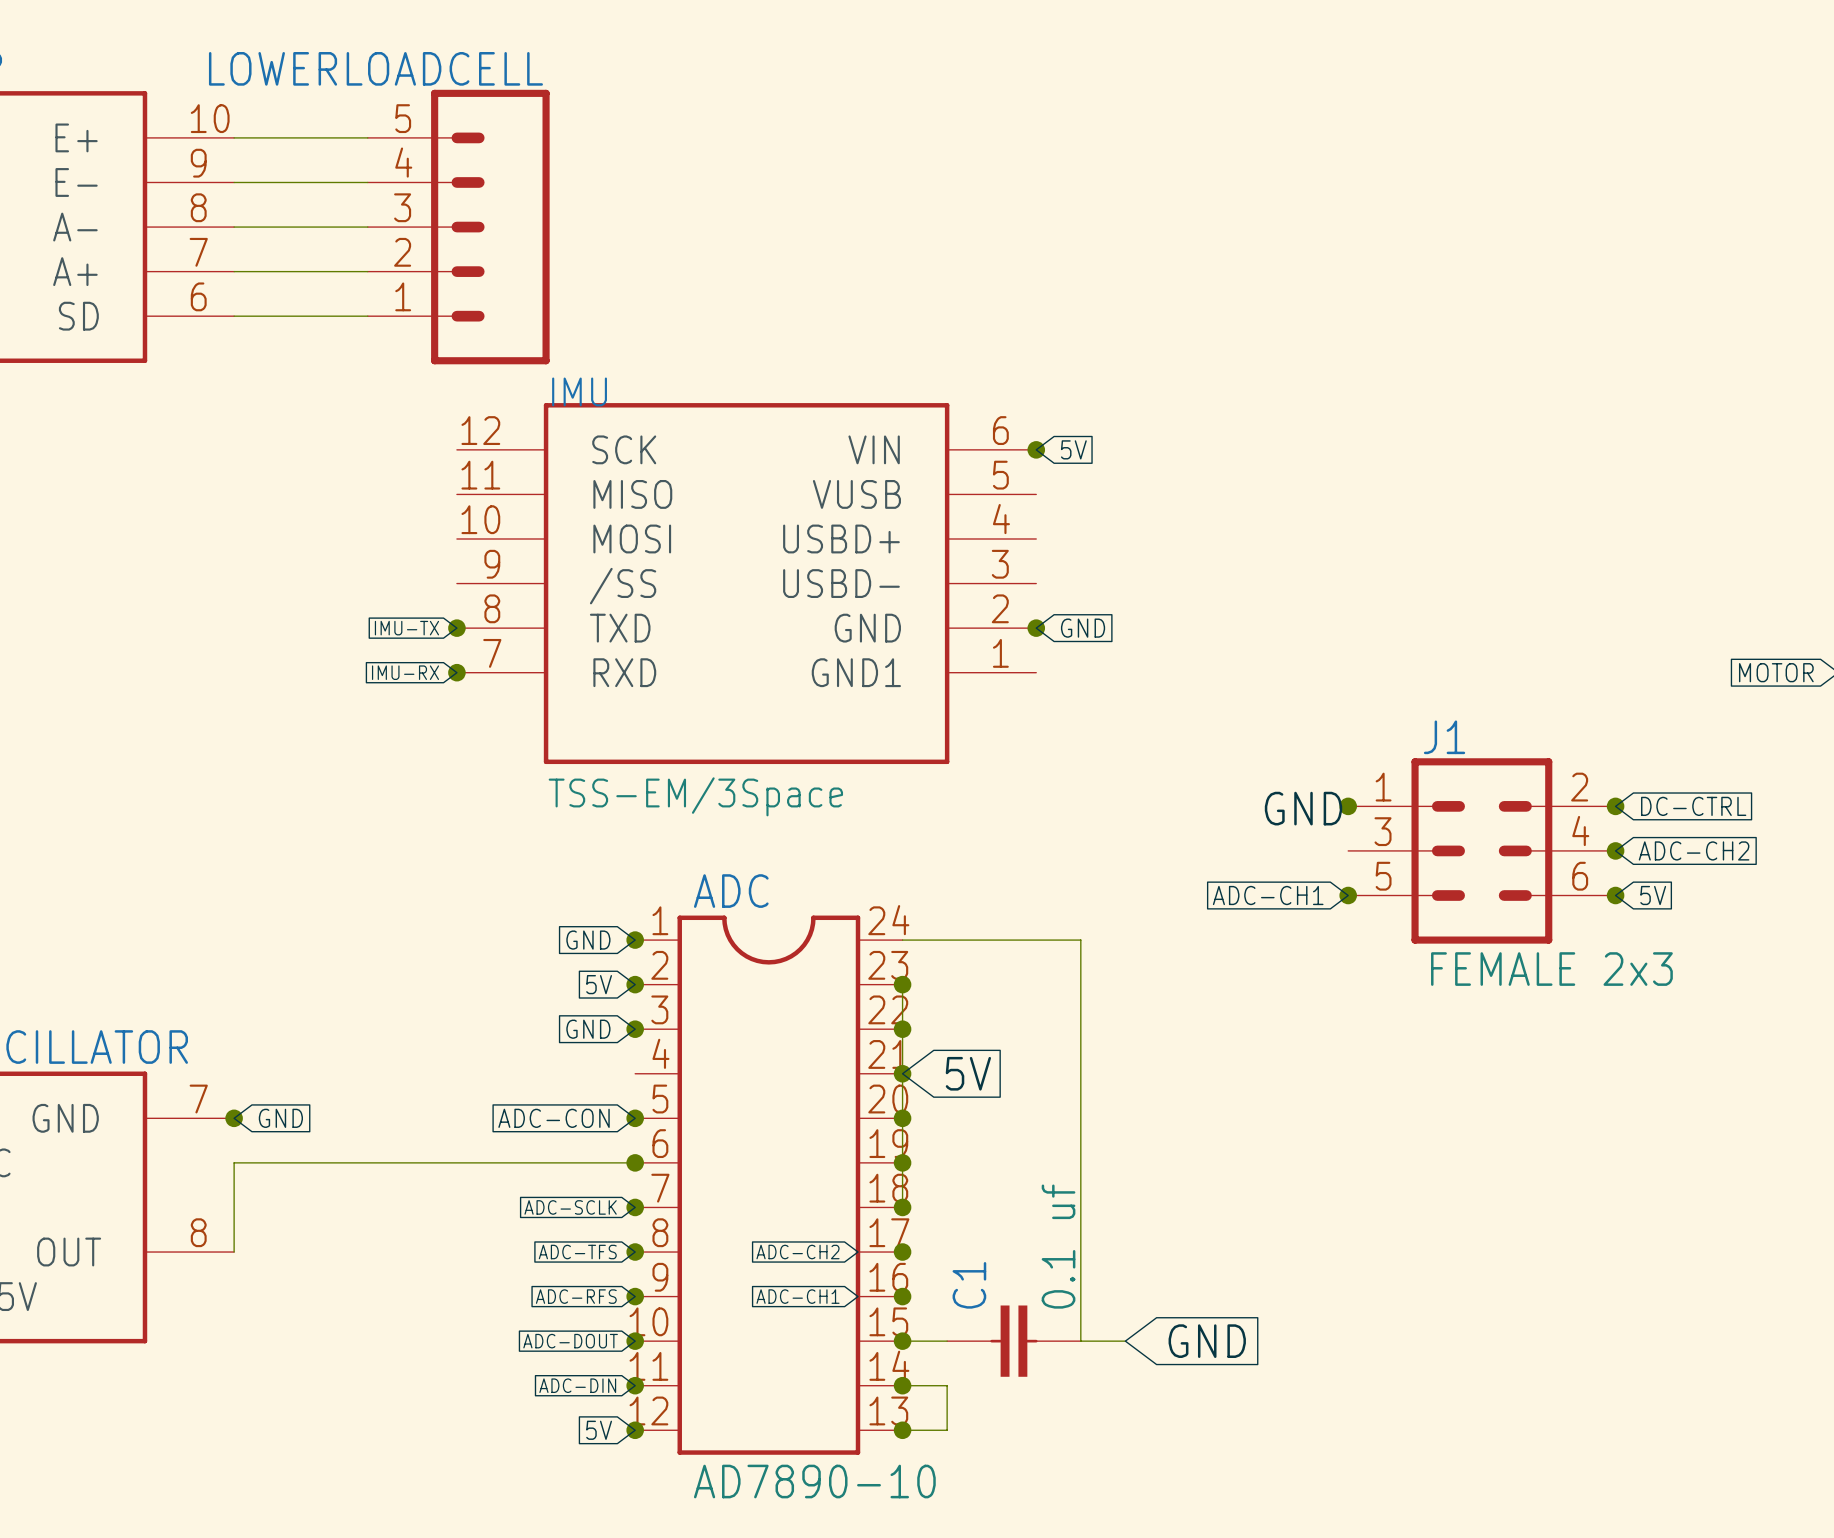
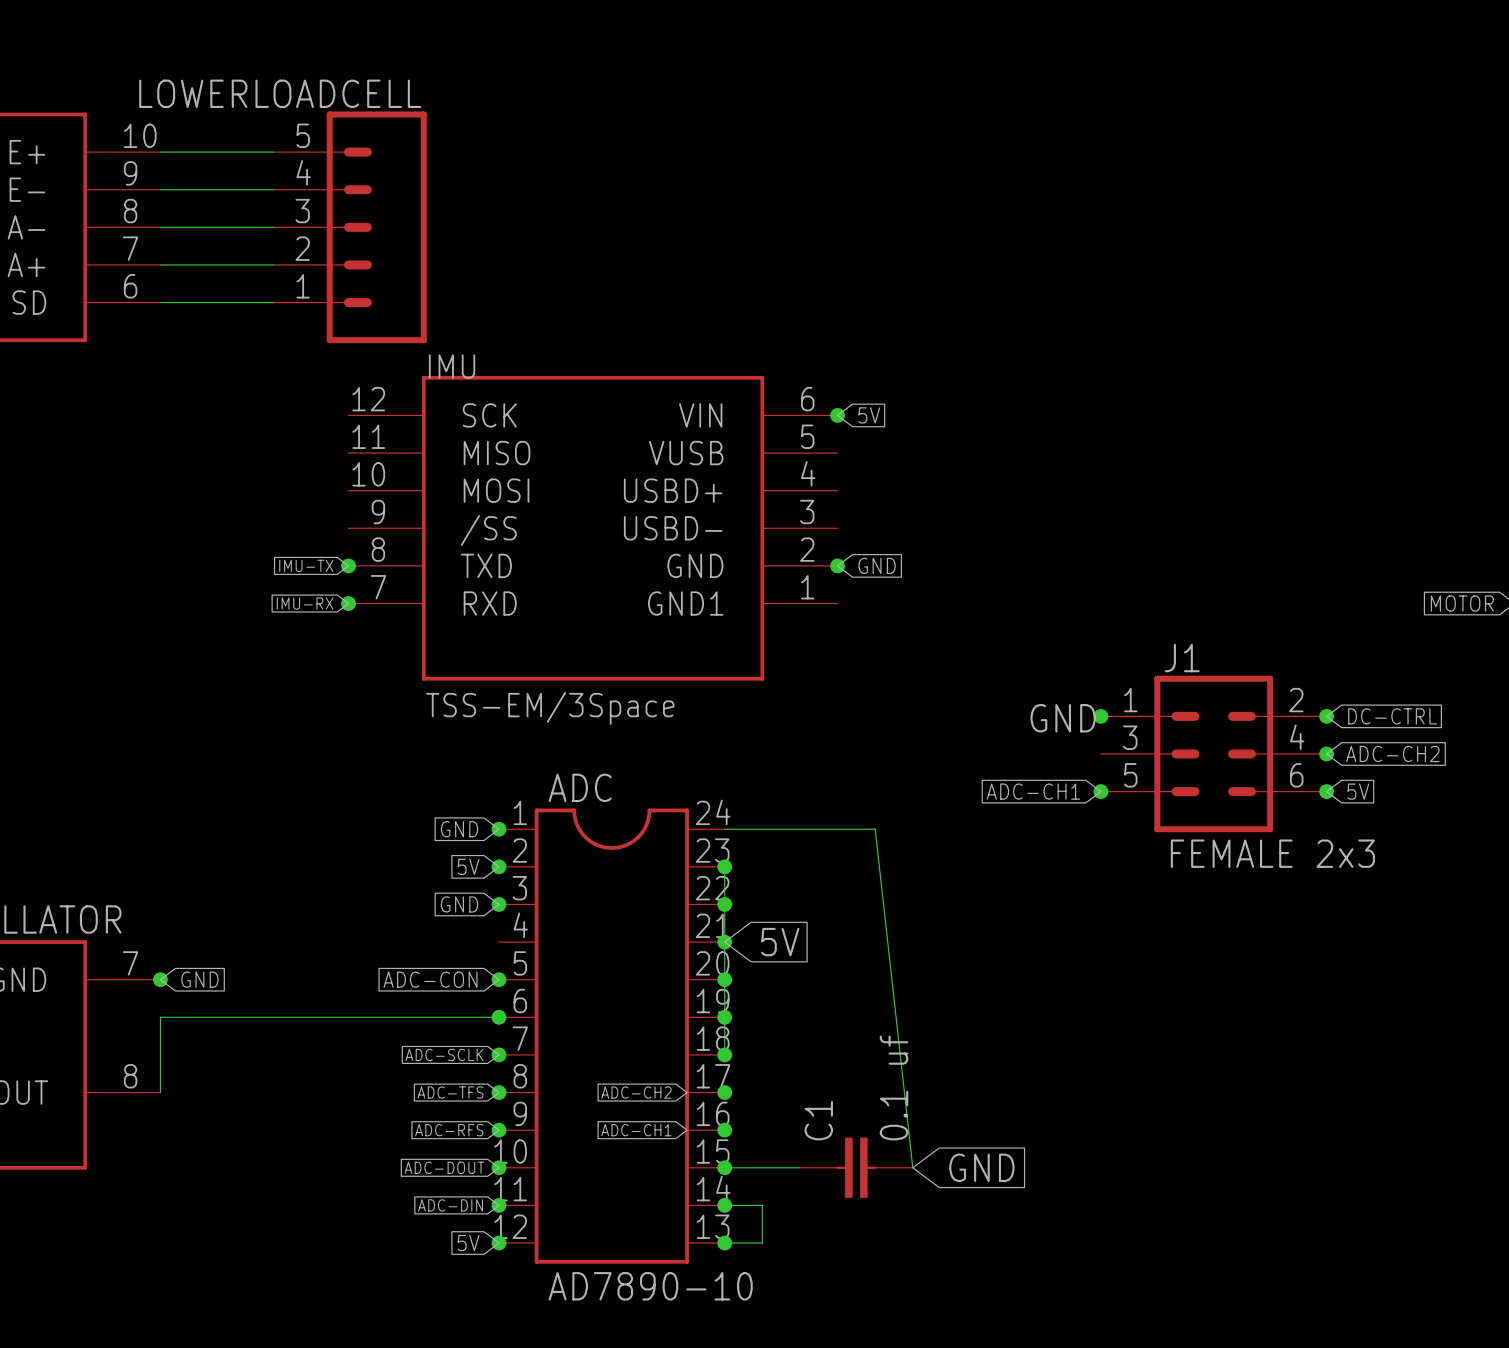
wire: (1080, 940) (1080, 1341) (1125, 1341) -> (875, 829) (912, 1167)
C1 position: (1013, 1341) -> (856, 1167)

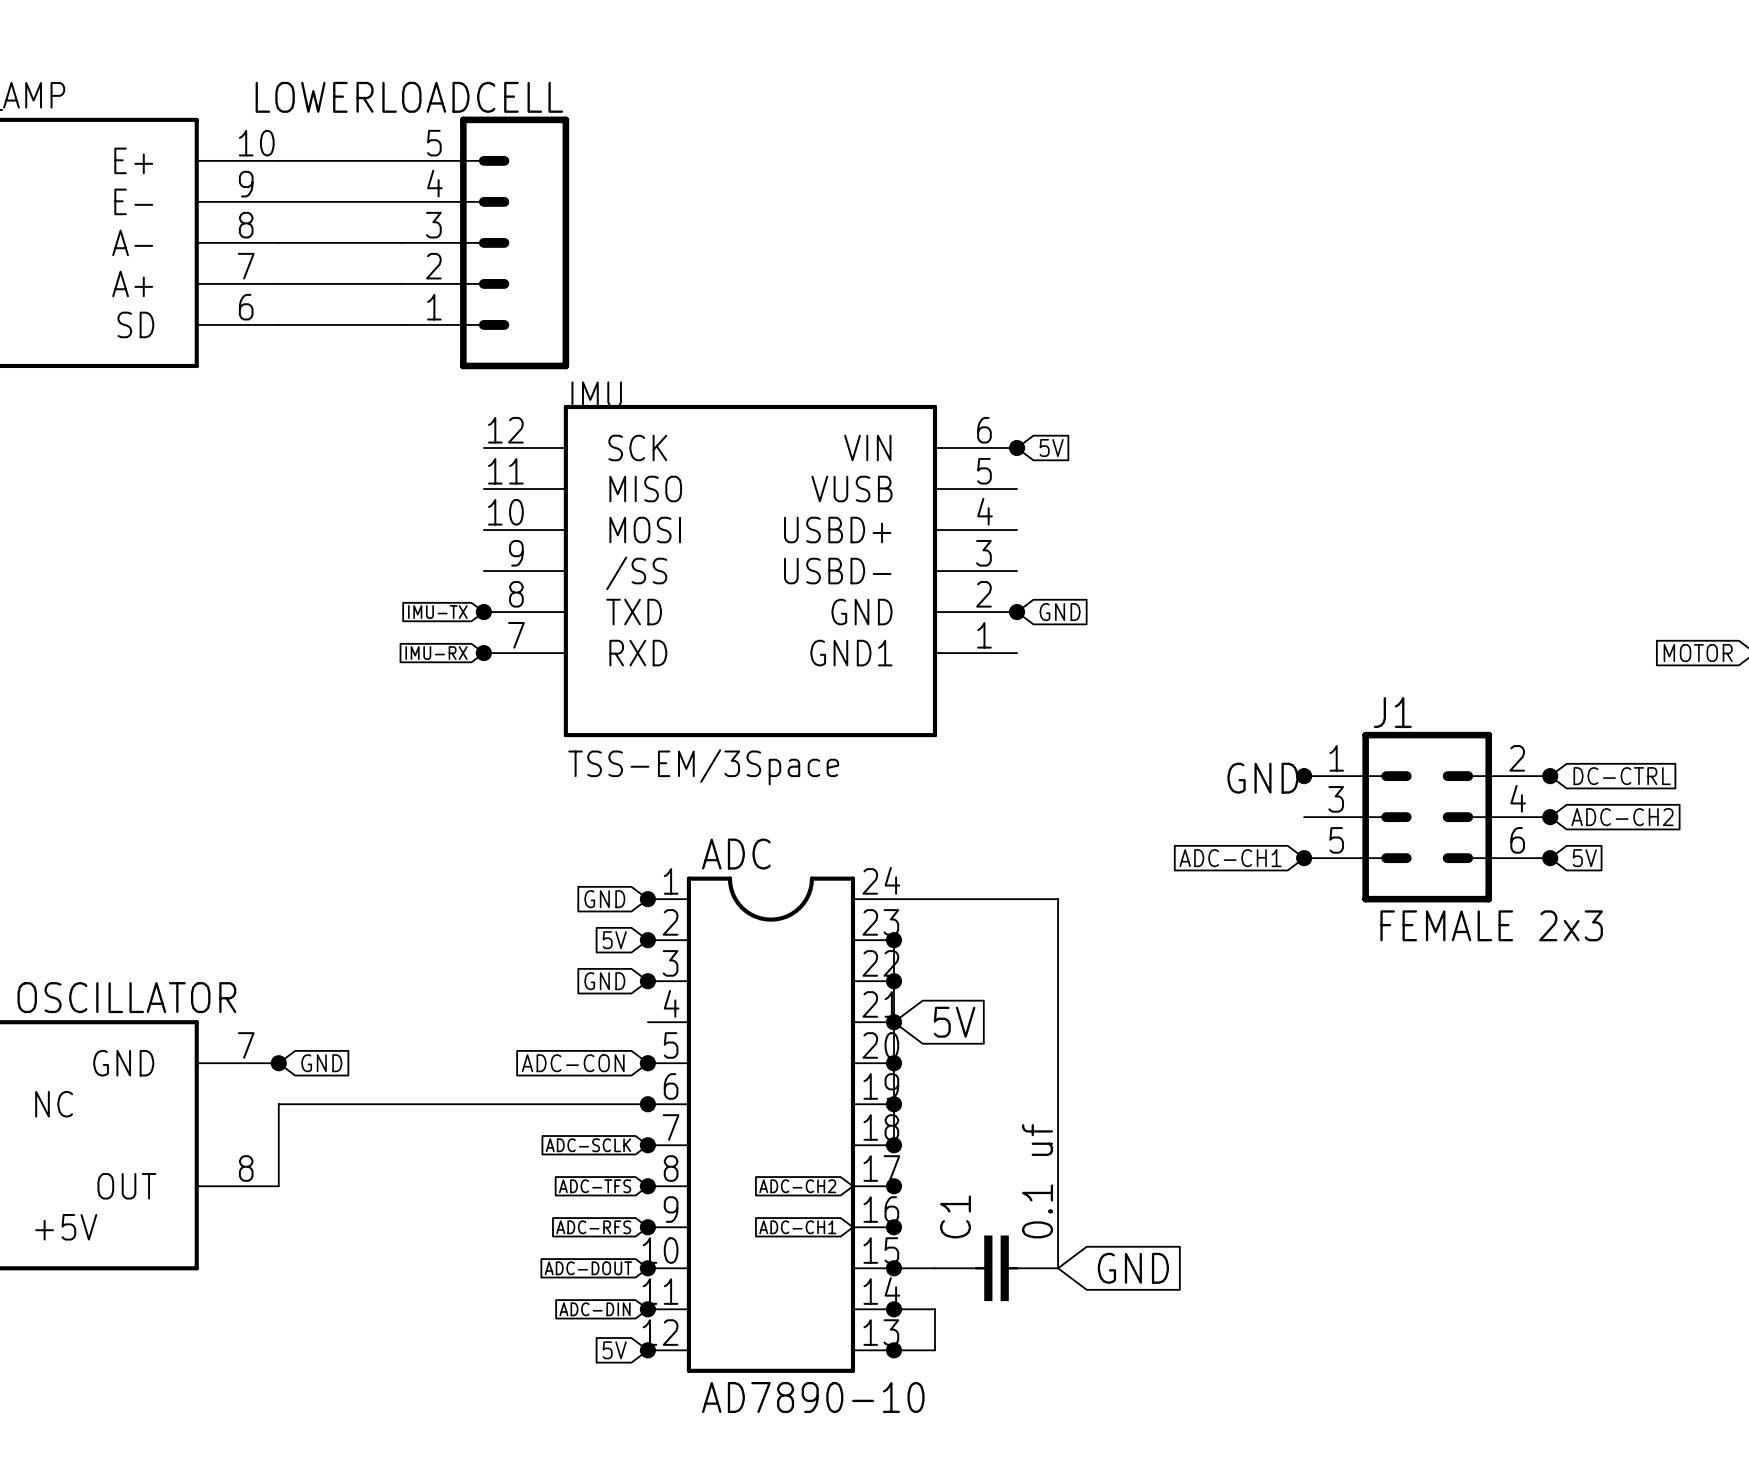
wire: (875, 829) (912, 1167) -> (1058, 899) (1058, 1268)
C1 position: (856, 1167) -> (996, 1268)
global label position: GND (981, 1167) -> GND (1133, 1268)

